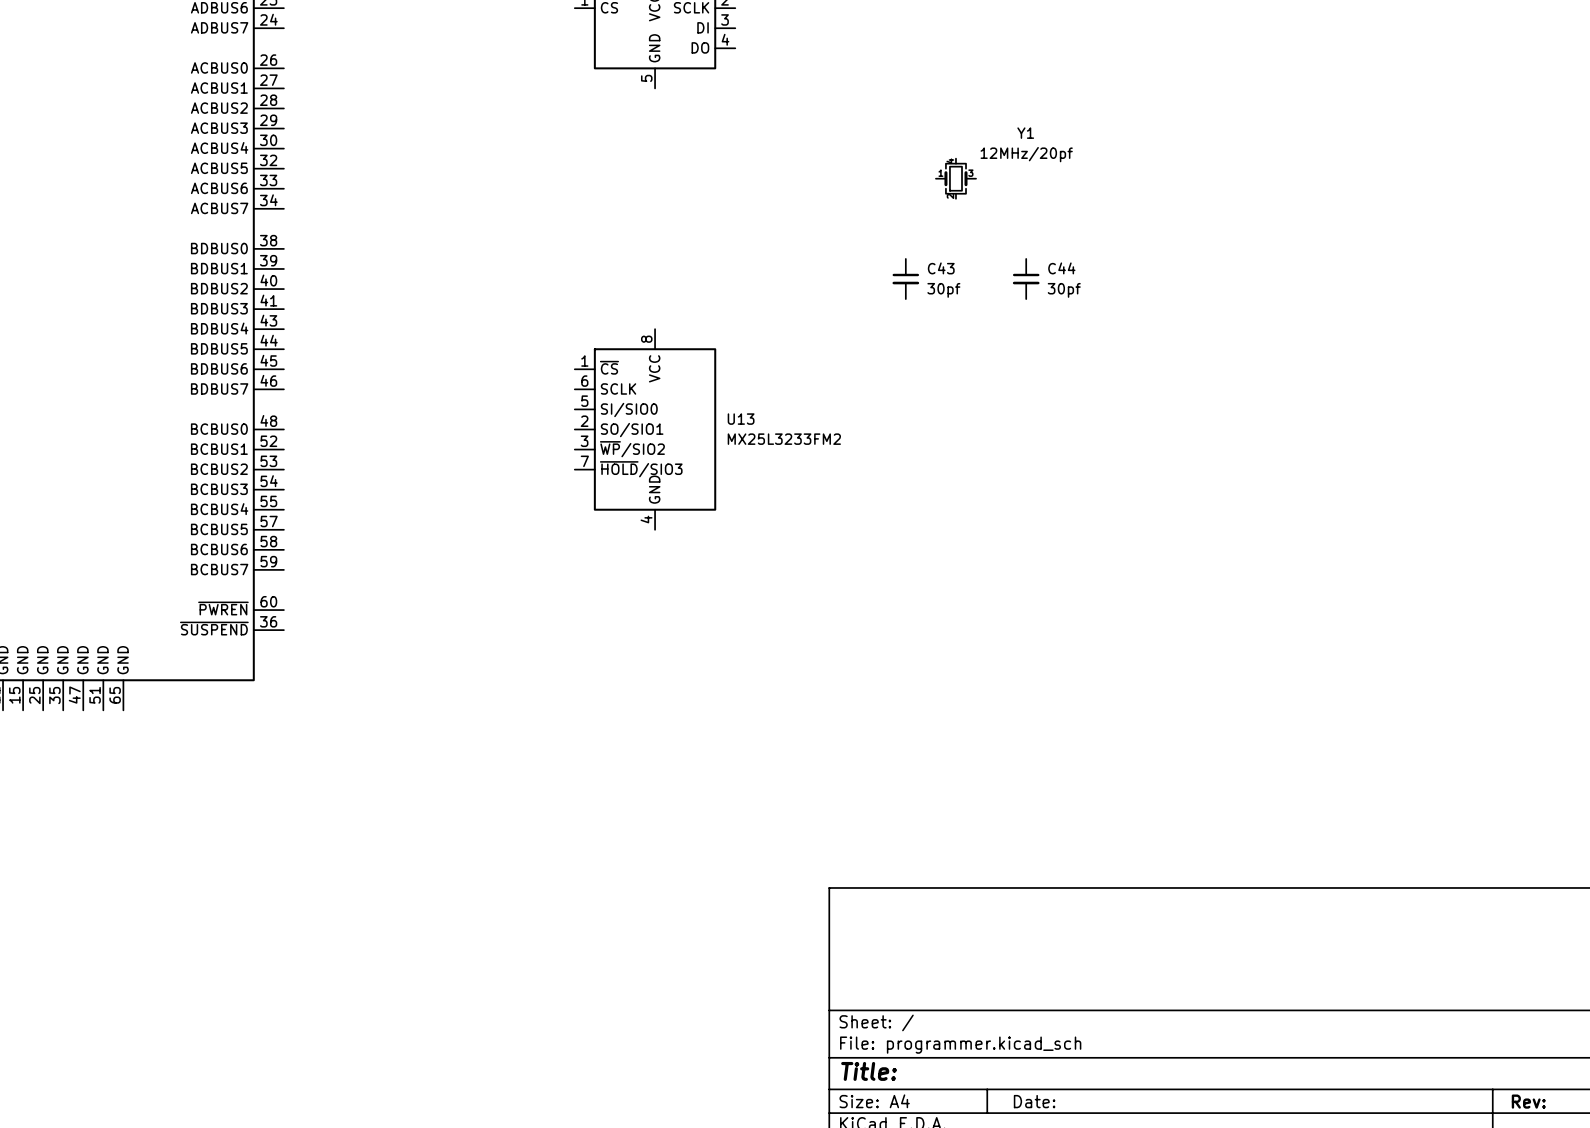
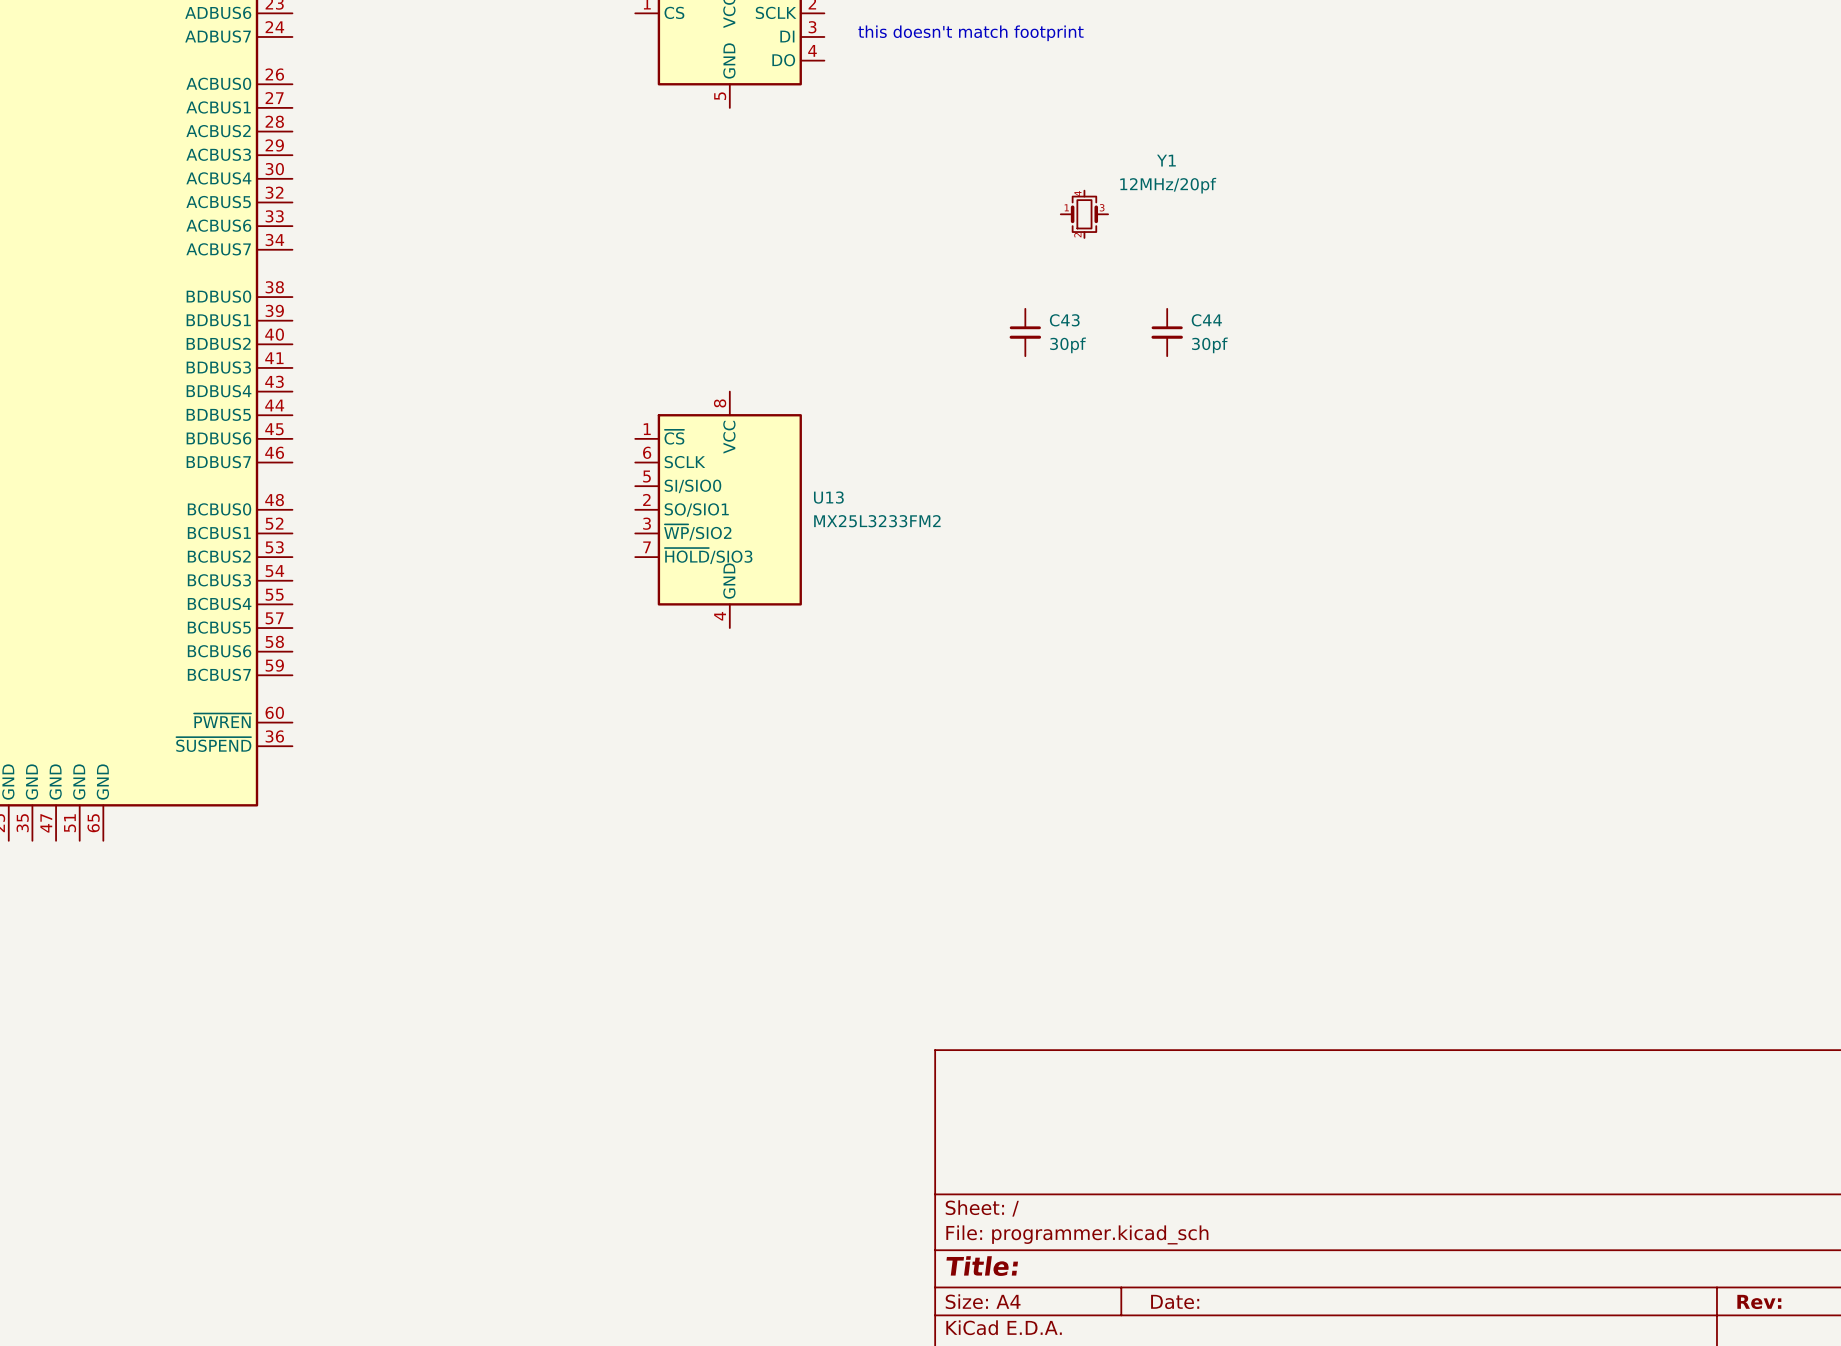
text: none -> this doesn't match footprint (970, 33)

